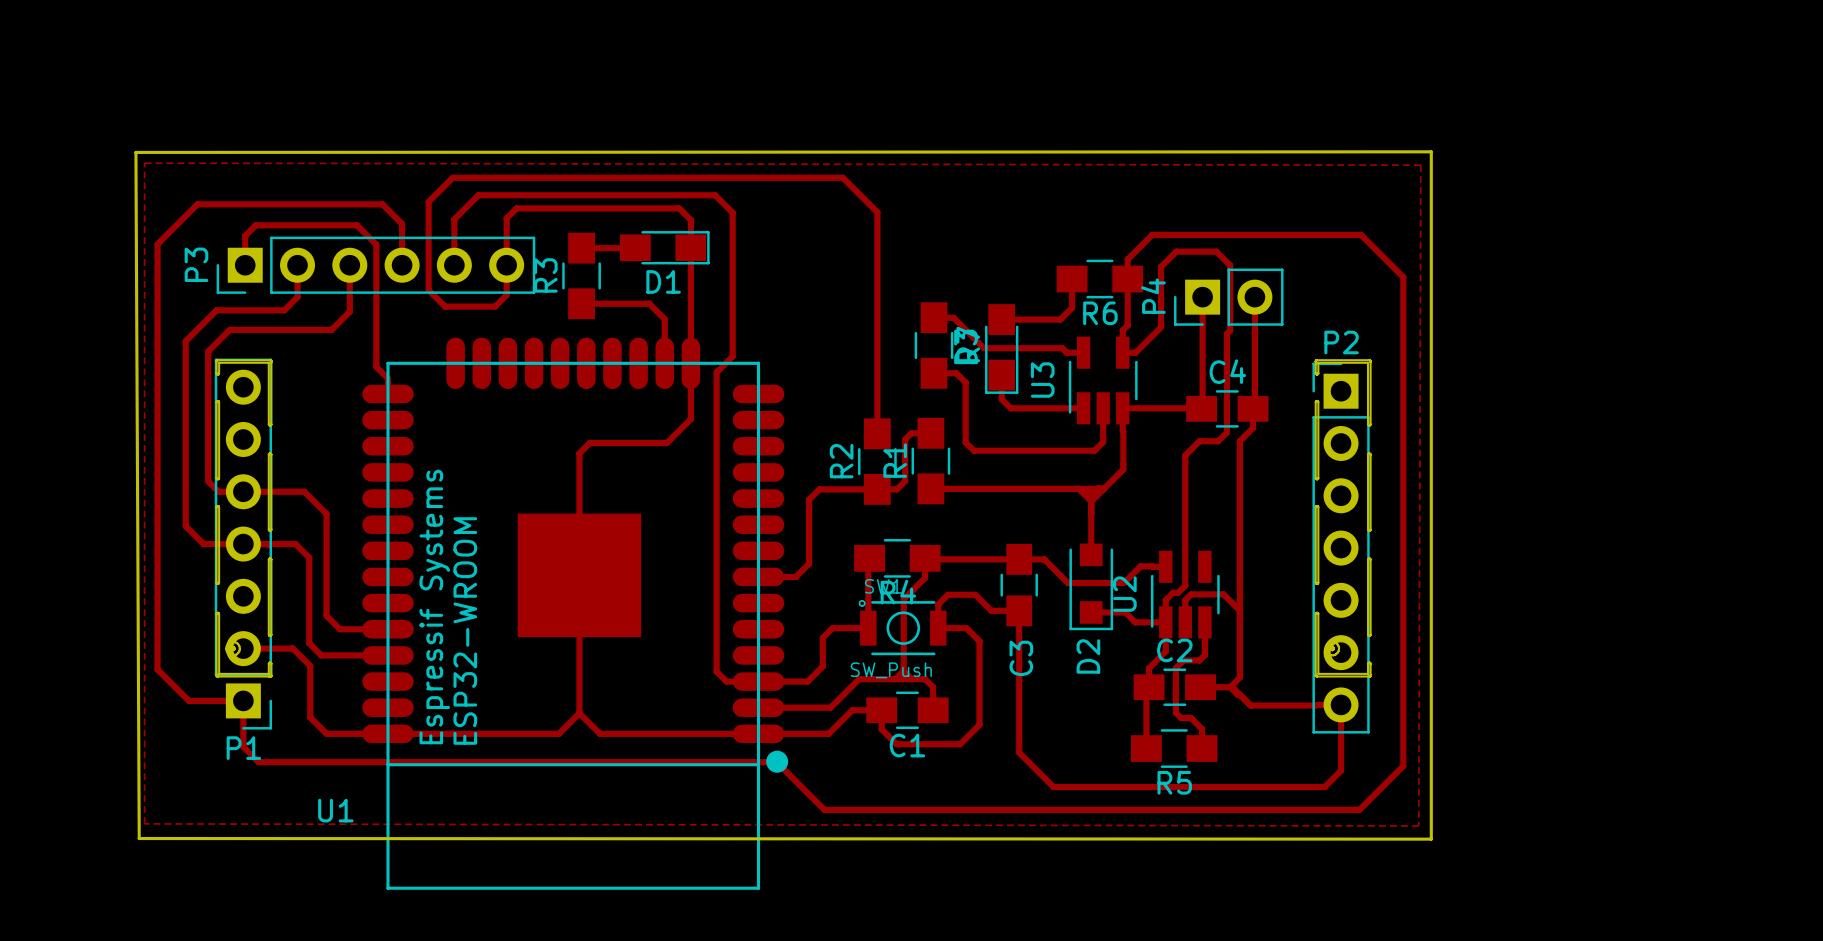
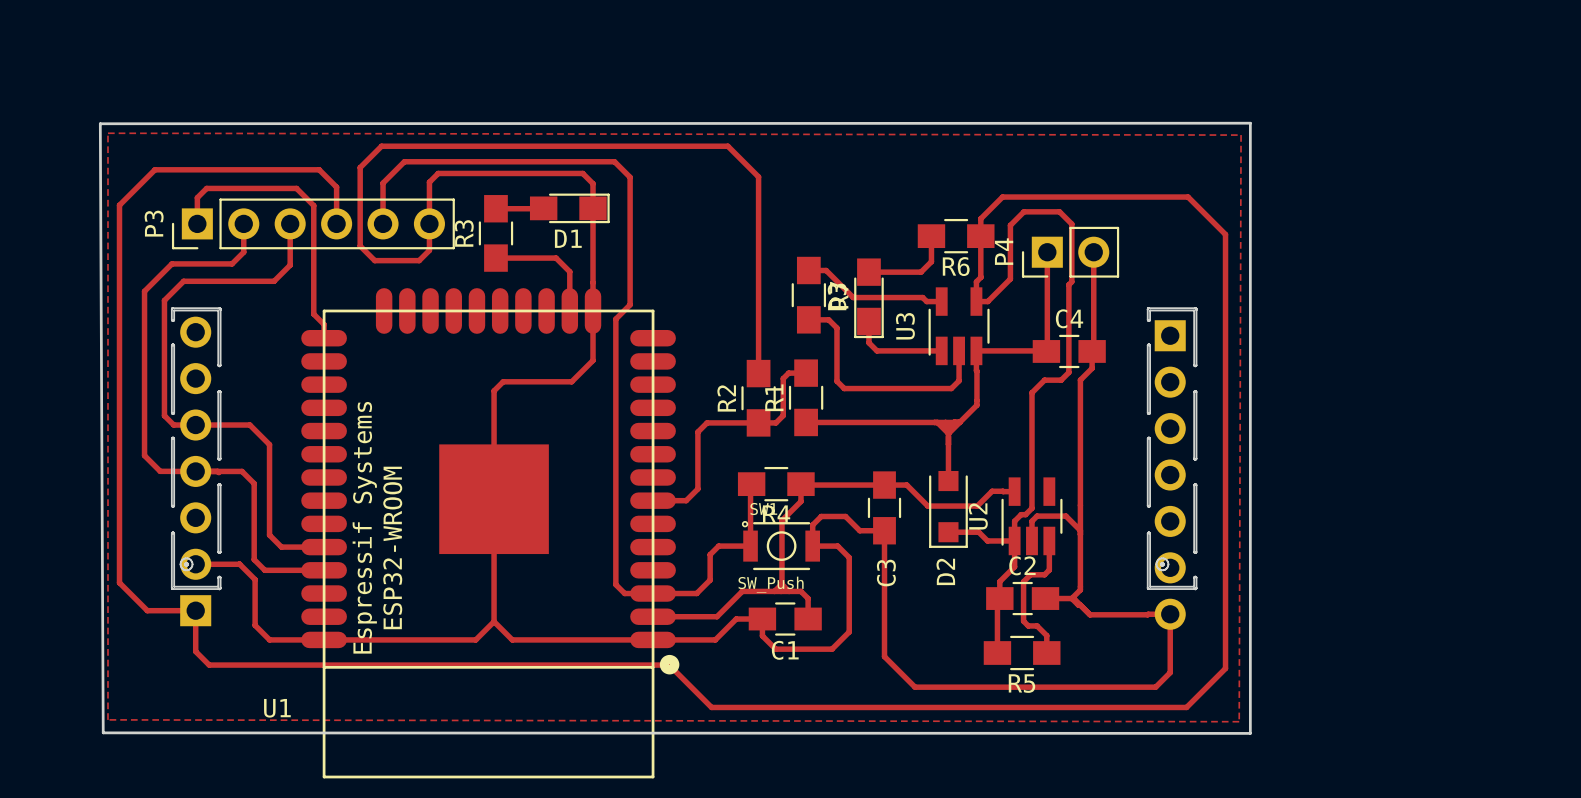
P1 side: top (243, 544) -> bottom (195, 471)
P2 side: top (1341, 548) -> bottom (1170, 475)

